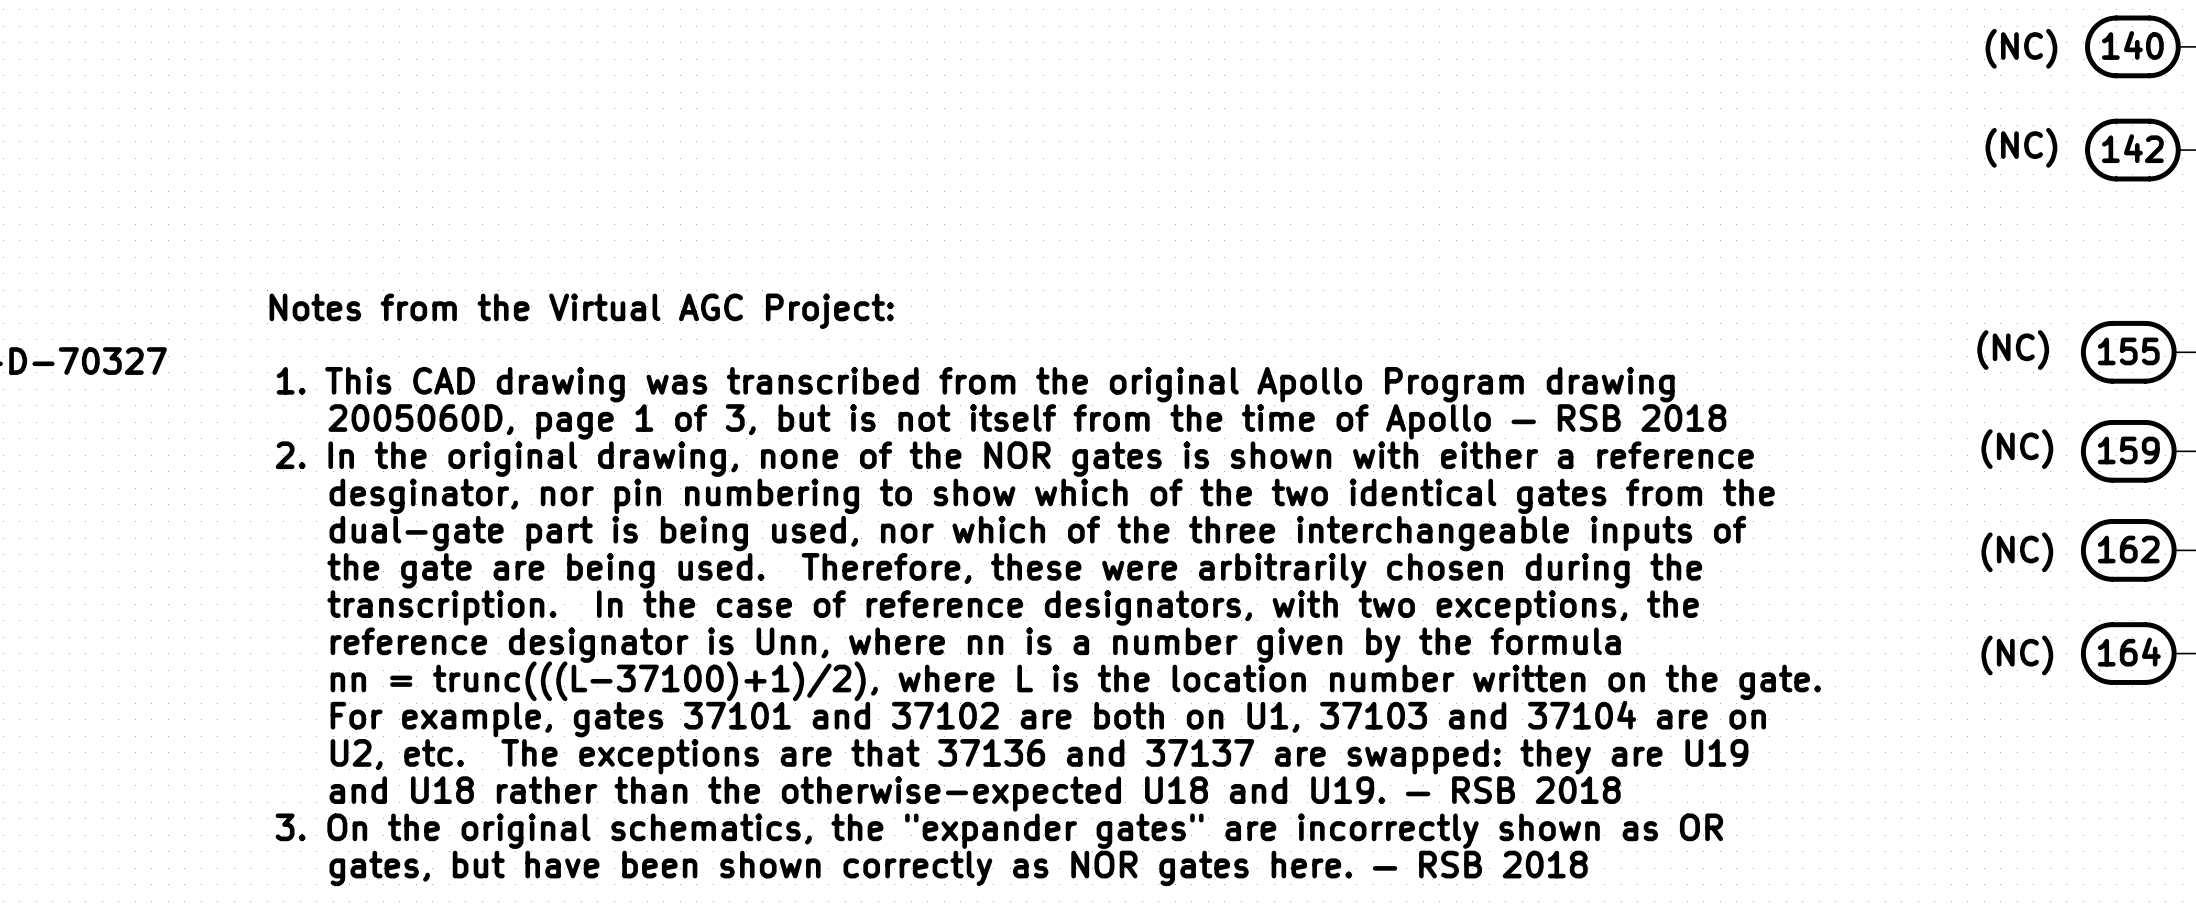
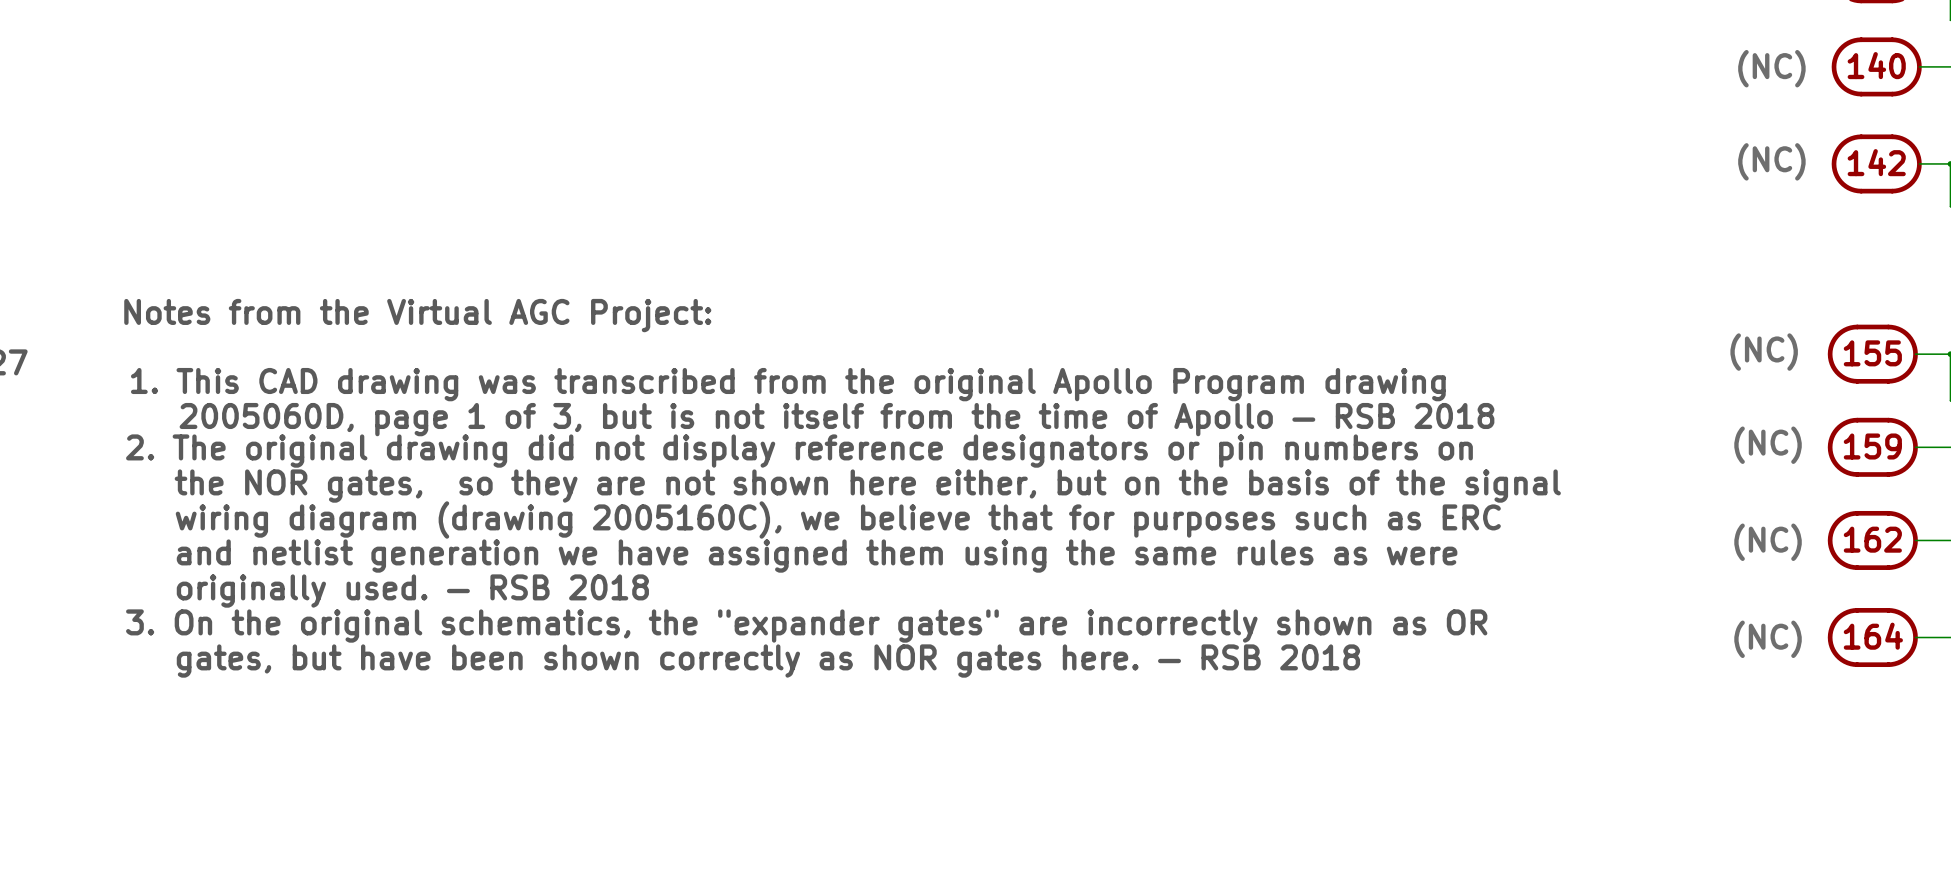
text: 2. In the original drawing, none of the NOR gates is shown with either a reference (1014, 459) -> 2. The original drawing did not display reference designators or pin numbers on (799, 451)
text: desginator, nor pin numbering to show which of the two identical gates from the (1052, 496) -> the NOR gates, so they are not shown here either, but on the basis of the signal (867, 486)
text: dual-gate part is being used, nor which of the three interchangeable inputs of (1037, 533) -> wiring diagram (drawing 2005160C), we believe that for purposes such as ERC (838, 519)
text: the gate are being used. Therefore, these were arbitrarily chosen during the (1014, 570) -> and netlist generation we have assigned them using the same rules as were (817, 556)
text: transcription. In the case of reference designators, with two exceptions, the (1013, 607) -> originally used. — RSB 2018 (412, 591)
text: reference designator is Unn, where nn is a number given by the formula (975, 645) -> 3. On the original schematics, the "expander gates" are incorrectly shown as OR (806, 626)
text: nn = trunc(((L-37100)+1)/2), where L is the location number written on the gate. (1075, 681) -> gates, but have been shown correctly as NOR gates here. — RSB 2018 (768, 661)
text: For example, gates 37101 and 37102 are both on U1, 37103 and 37104 are on (1048, 719) -> none
text: U2, etc. The exceptions are that 37136 and 37137 are swapped: they are U19 (1039, 756) -> none
text: and U18 rather than the otherwise-expected U18 and U19. — RSB 2018 (975, 793) -> none
text: 3. On the original schematics, the "expander gates" are incorrectly shown as OR (999, 831) -> none
text: gates, but have been shown correctly as NOR gates here. — RSB 2018 (958, 868) -> none

